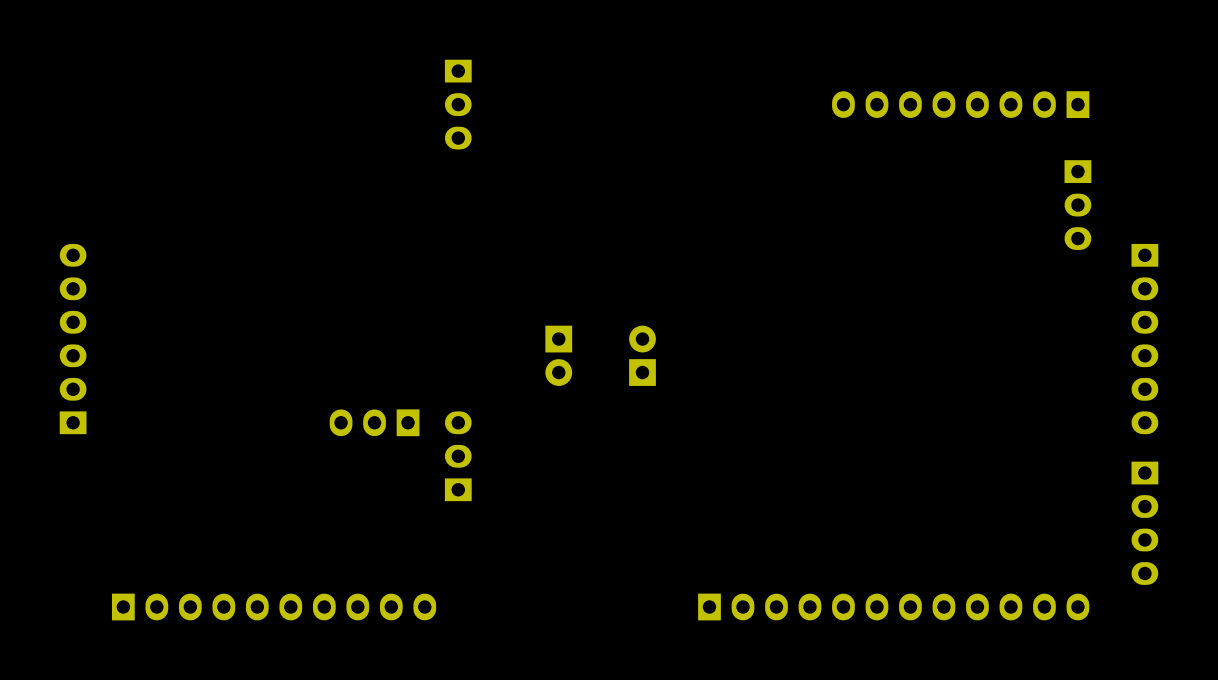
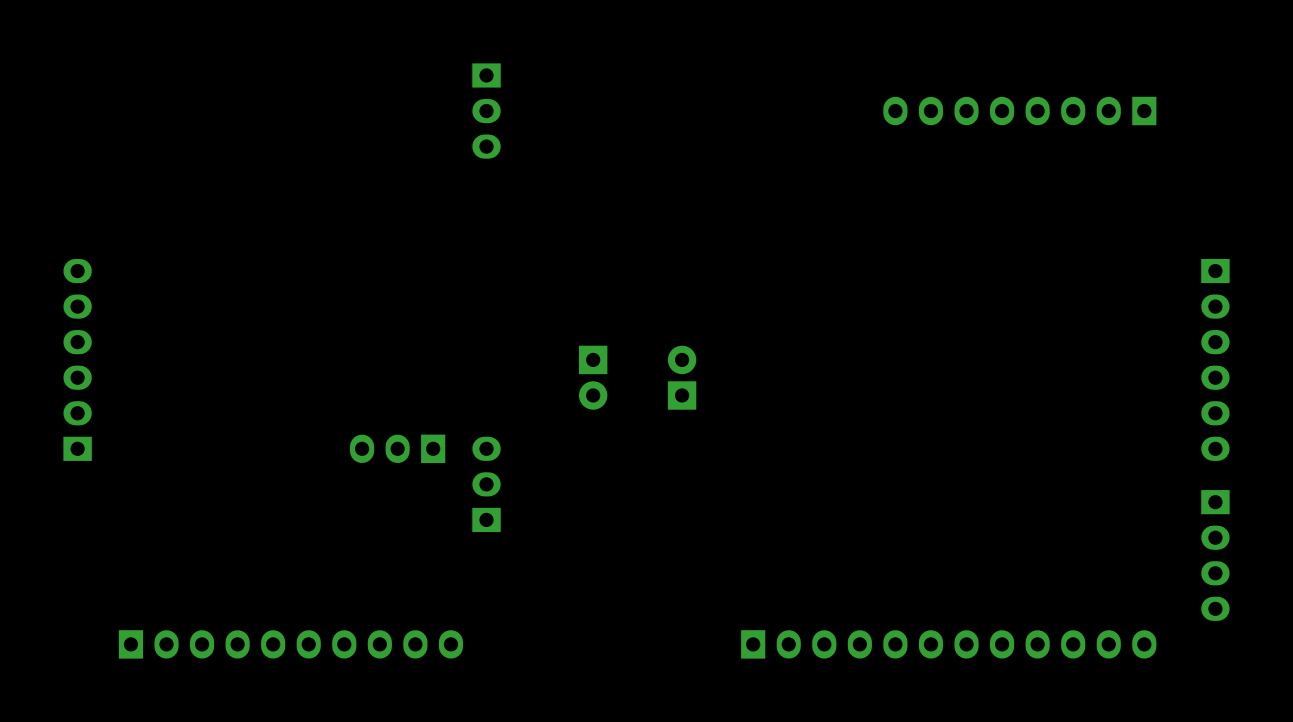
part: (1077, 205) -> none

